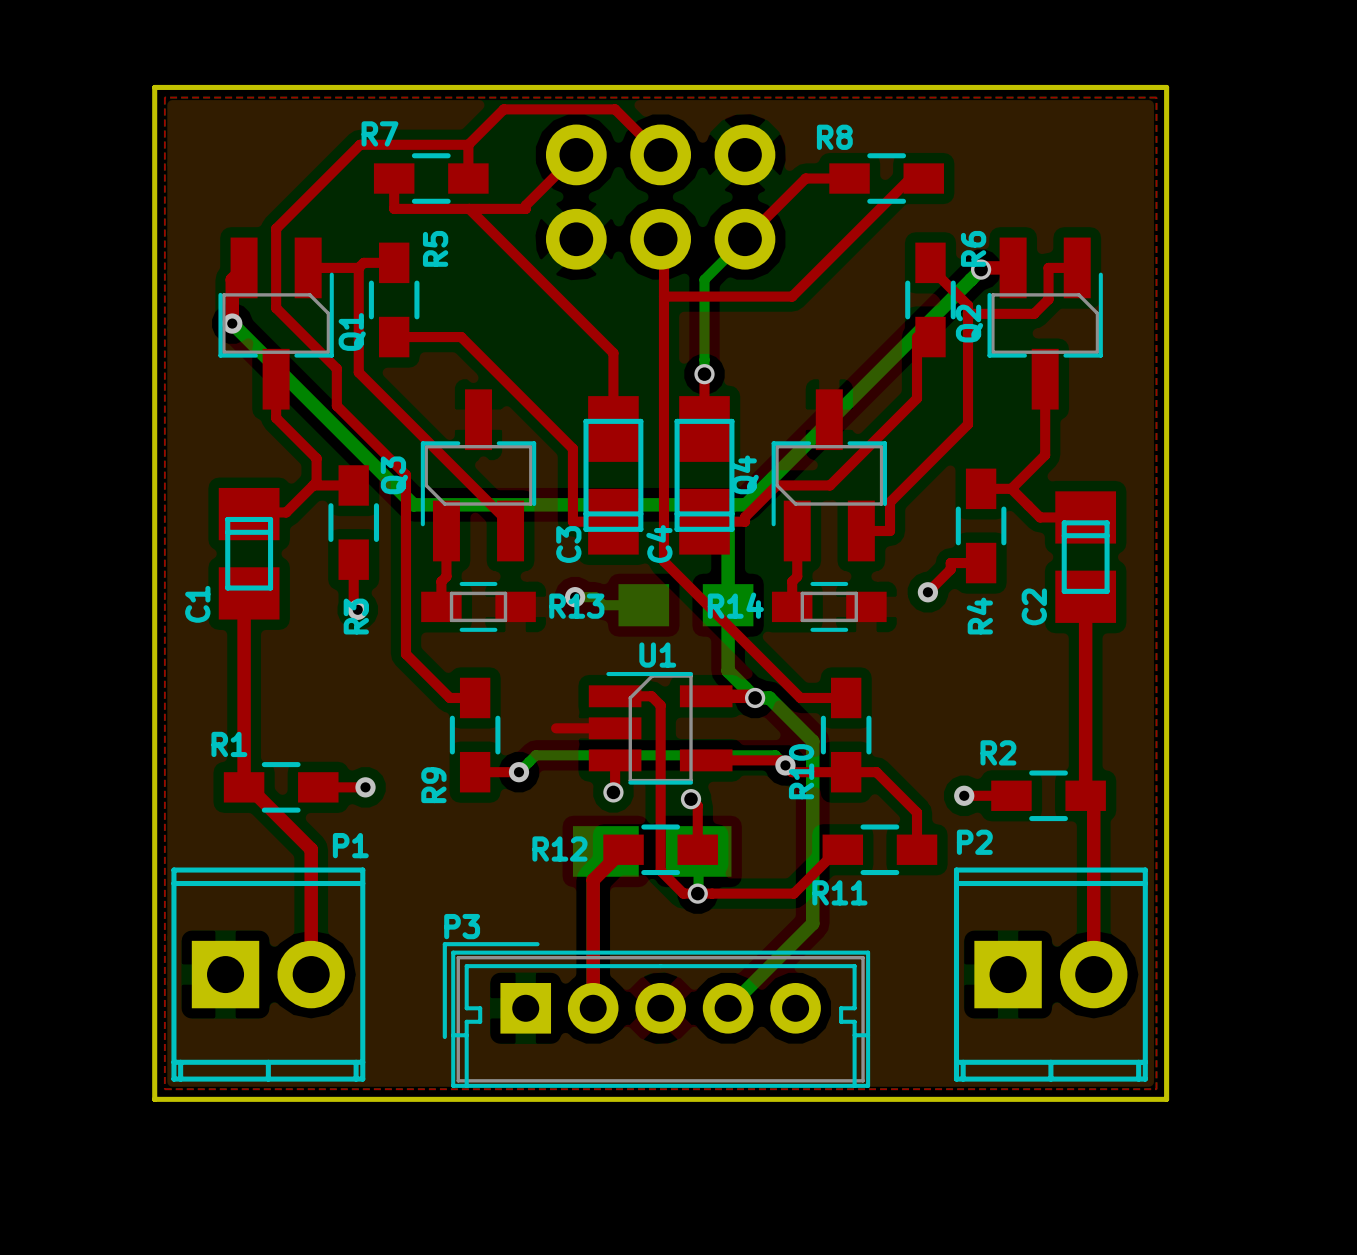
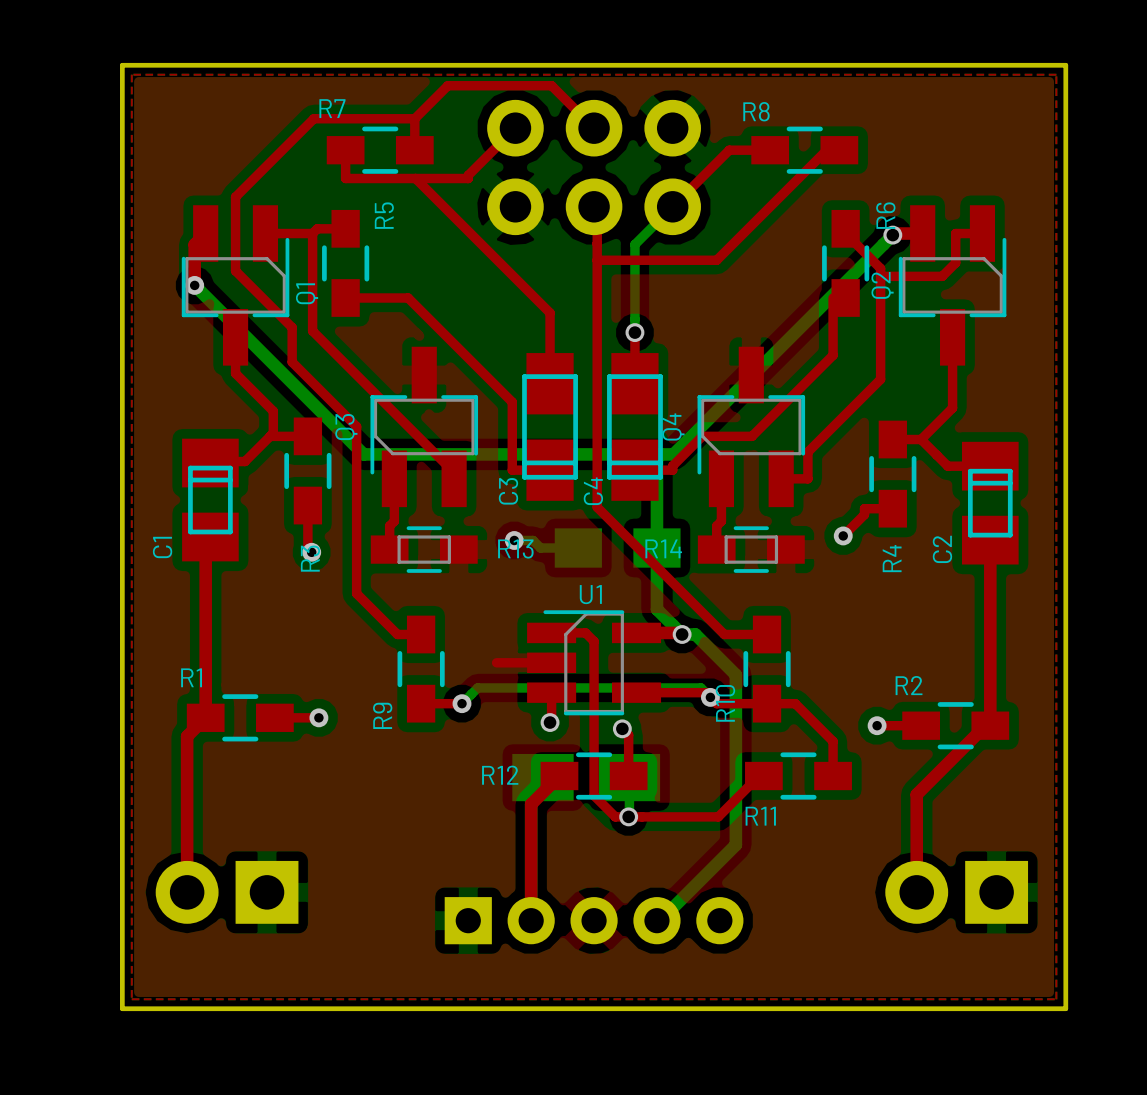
top track: none -> (205, 717) (187, 736) (187, 892)
top track: (249, 787) (311, 849) (311, 974) -> none
top track: none -> (990, 725) (985, 725) (916, 794) (916, 892)
top track: (1093, 803) (1093, 974) -> none
P1 side: top (268, 974) -> bottom (227, 892)
P2 side: top (1050, 974) -> bottom (956, 892)
P3 side: top (656, 1015) -> bottom (594, 920)

